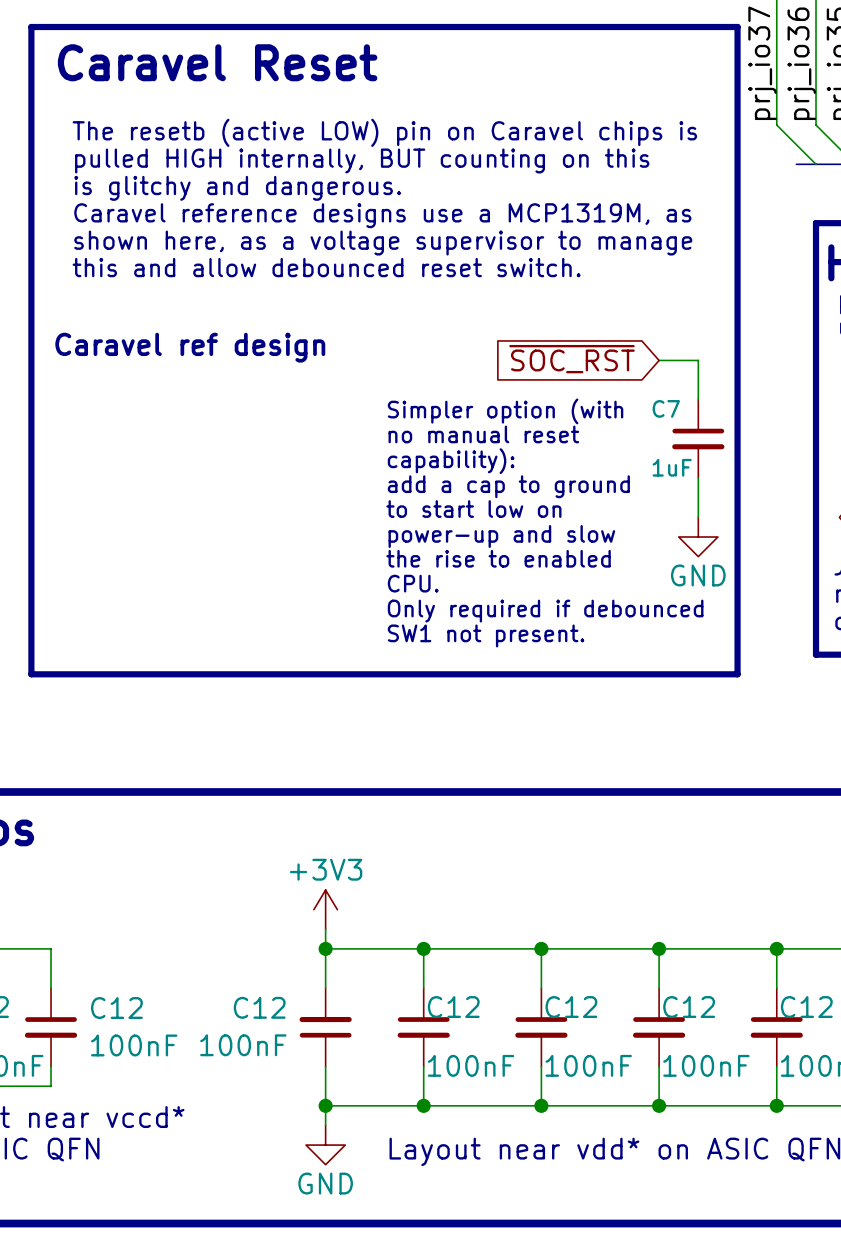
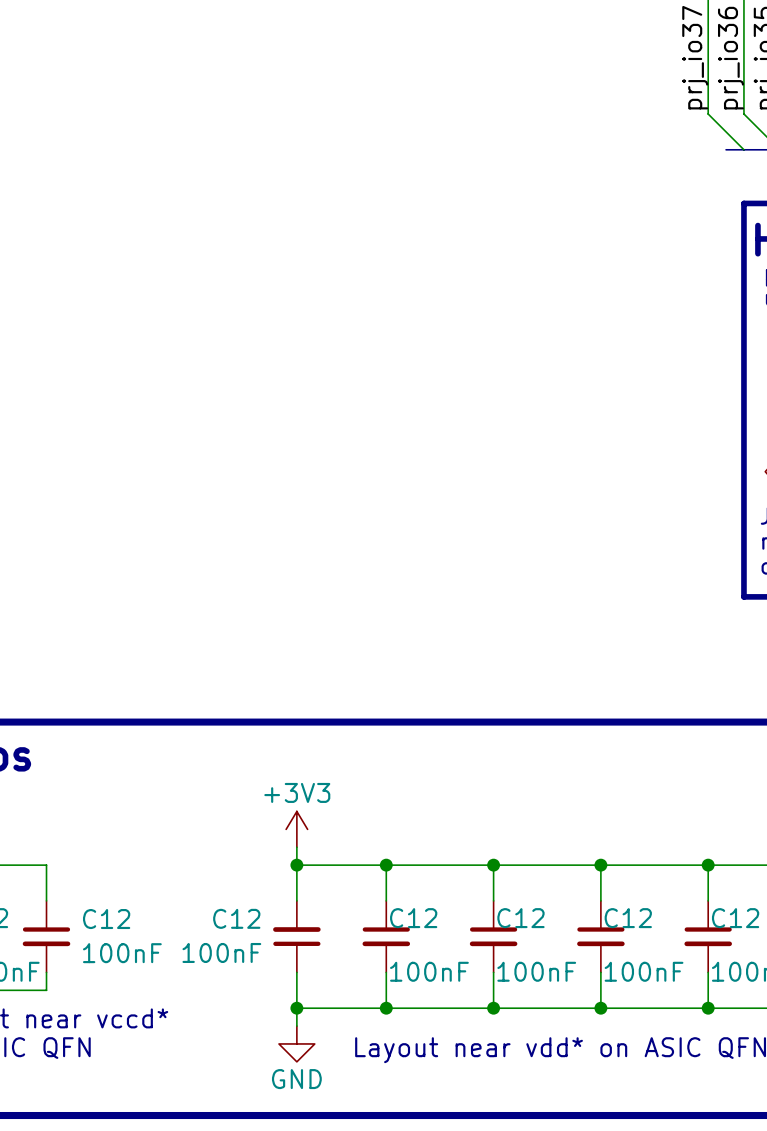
line: (31, 27) (737, 27) (737, 674) (31, 674) (31, 27) -> none
text: Caravel Reset (217, 62) -> none
text: The resetb (active LOW) pin on Caravel chips is (384, 132) -> none
text: pulled HIGH internally, BUT counting on this (362, 160) -> none
text: is glitchy and dangerous. (237, 188) -> none
text: Caravel reference designs use a MCP1319M, as (382, 215) -> none
text: shown here, as a voltage supervisor to manage (383, 243) -> none
text: this and allow debounced reset switch. (326, 267) -> none
text: Caravel ref design (190, 347) -> none
global label: ~{SOC_RST} (572, 359) -> none
wire: (659, 360) (698, 360) (698, 399) -> none
text: Simpler option (with (505, 411) -> none
text: no manual reset (483, 434) -> none
C7: 1uF (698, 438) -> none
text: capability): (451, 461) -> none
wire: (698, 478) (698, 517) -> none
text: add a cap to ground (508, 486) -> none
text: to start low on (473, 509) -> none
text: power-up and slow (501, 536) -> none
power symbol: GND (698, 537) -> none
text: the rise to enabled (498, 558) -> none
text: CPU. (413, 583) -> none
text: Only required if debounced (545, 611) -> none
text: SW1 not present. (486, 635) -> none

